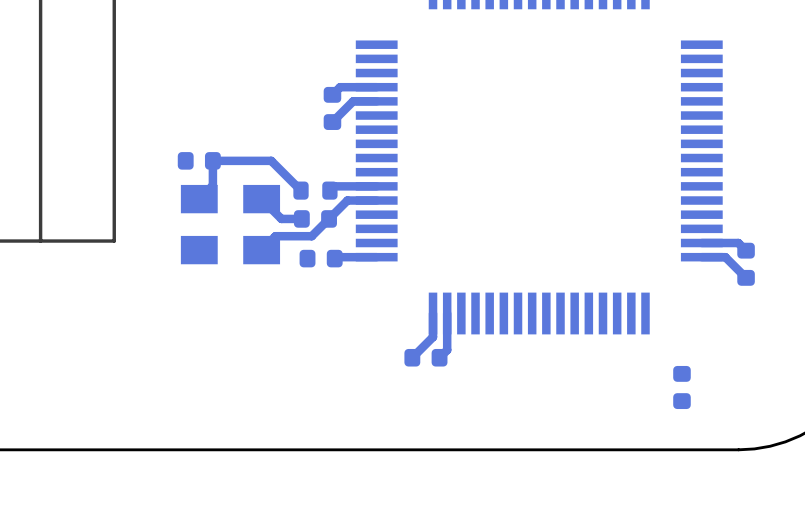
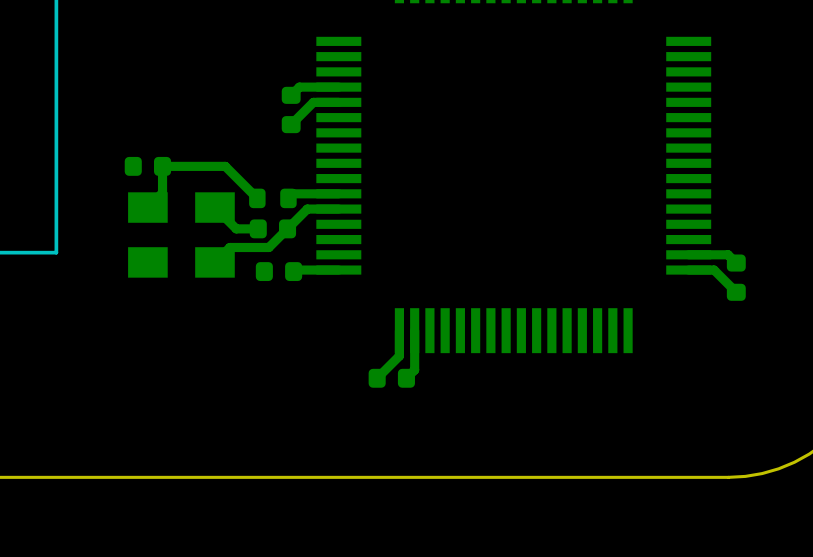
part: (681, 387) -> none

